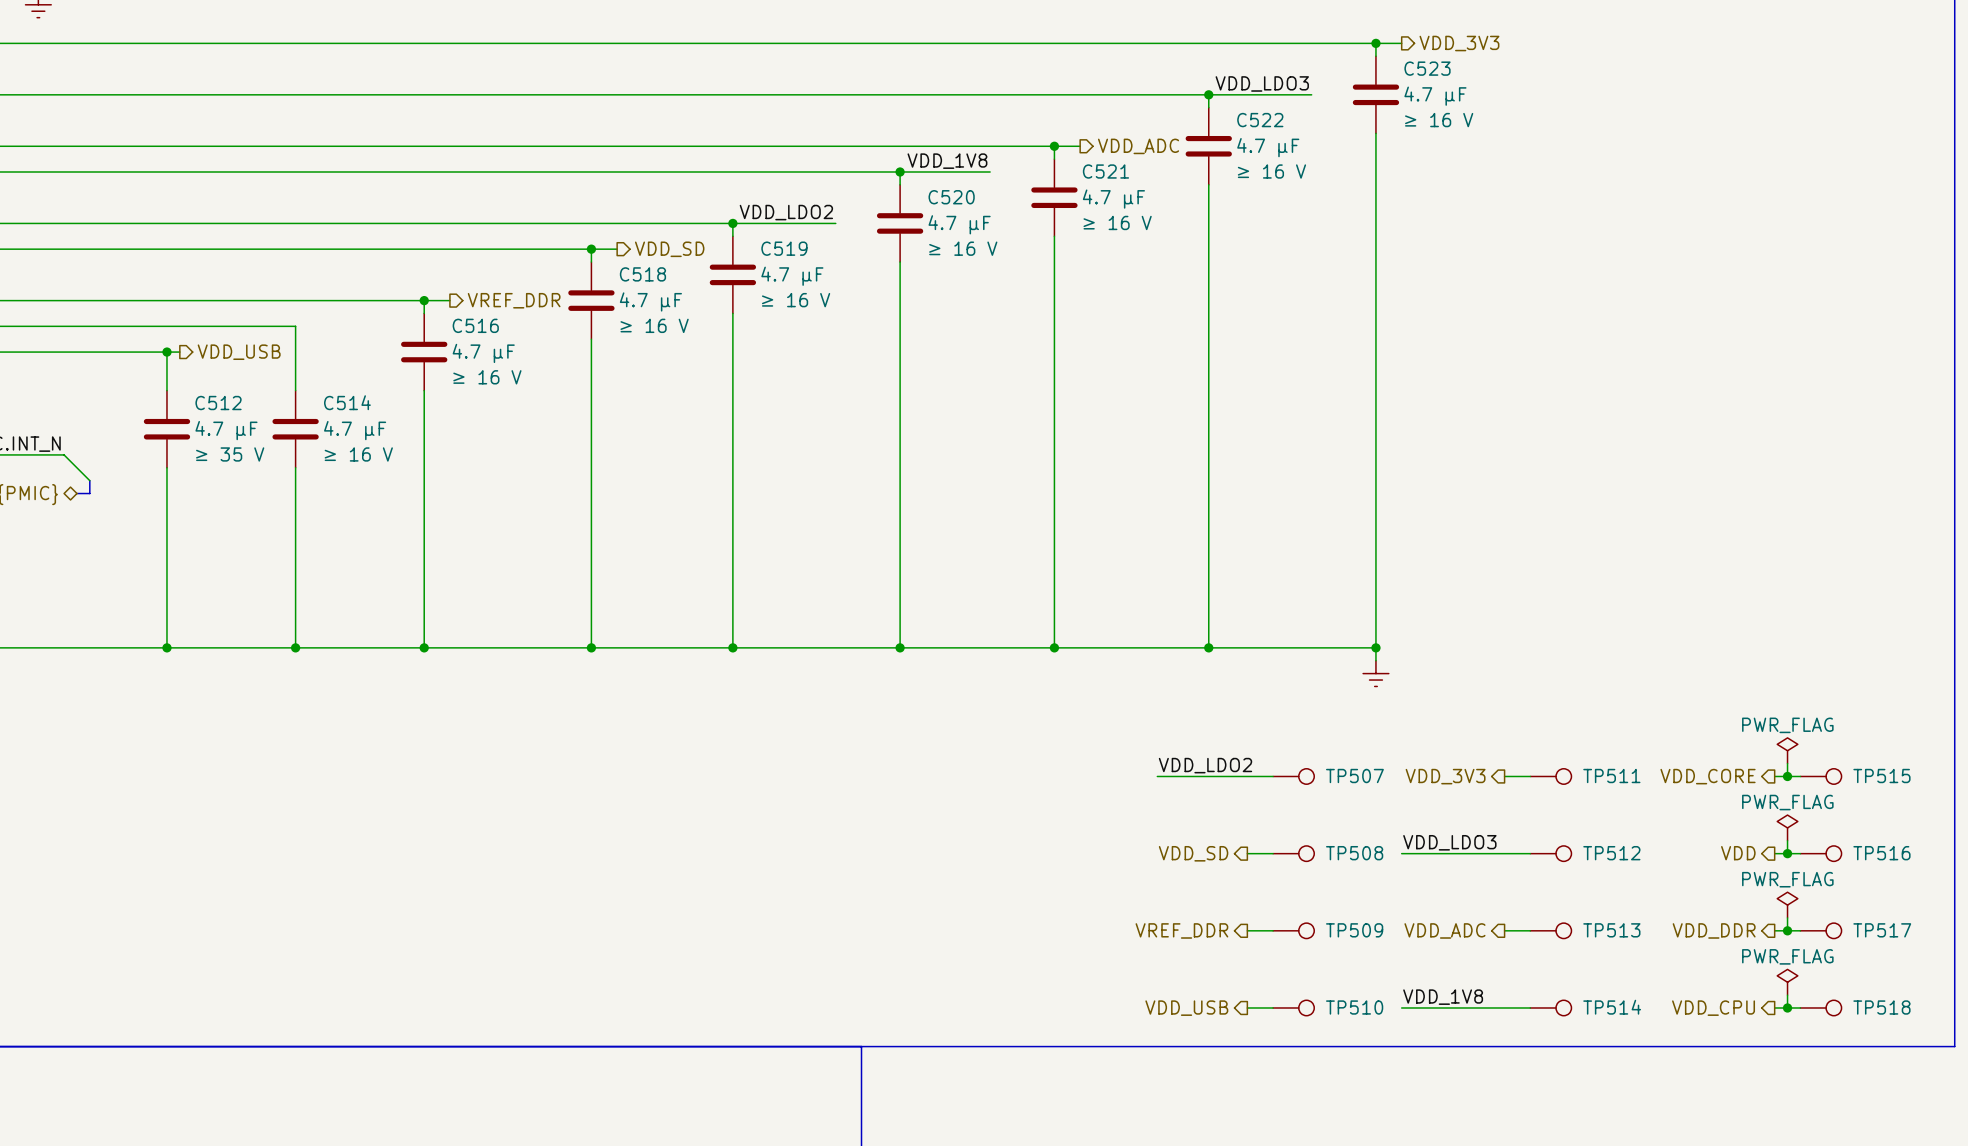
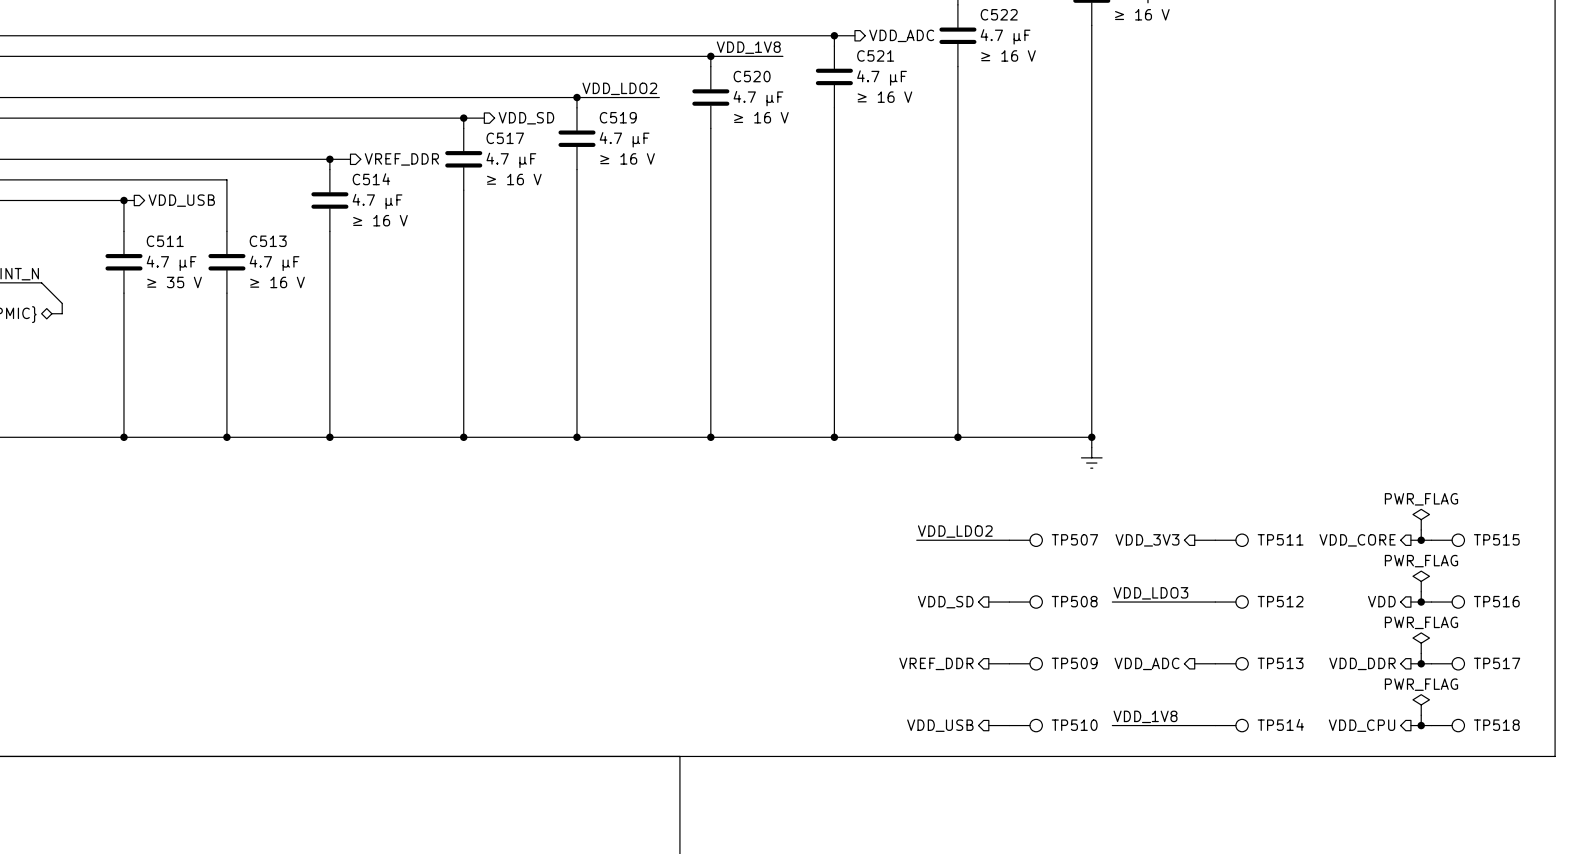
C518 name: C518 (642, 274) -> C517 (505, 138)
C516 name: C516 (475, 325) -> C514 (371, 179)
C514 name: C514 (347, 402) -> C513 (268, 241)
C512 name: C512 (218, 403) -> C511 (165, 241)

